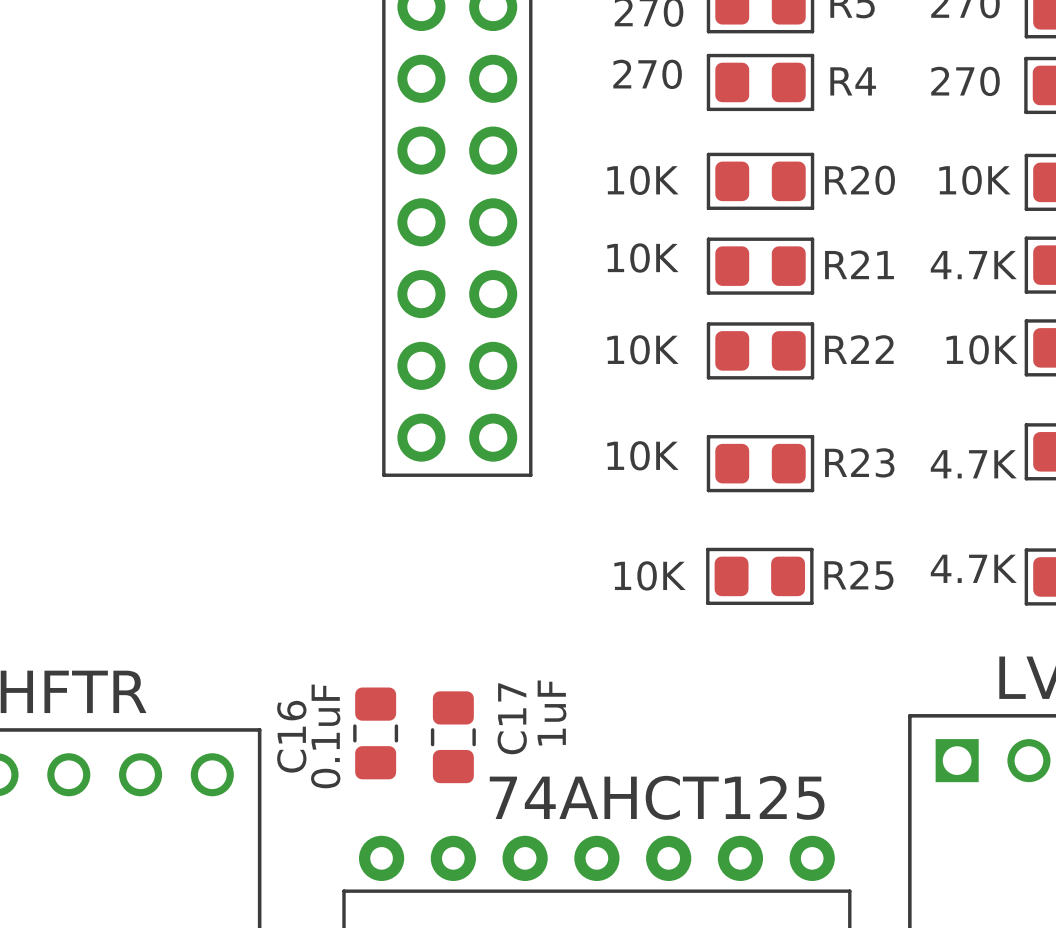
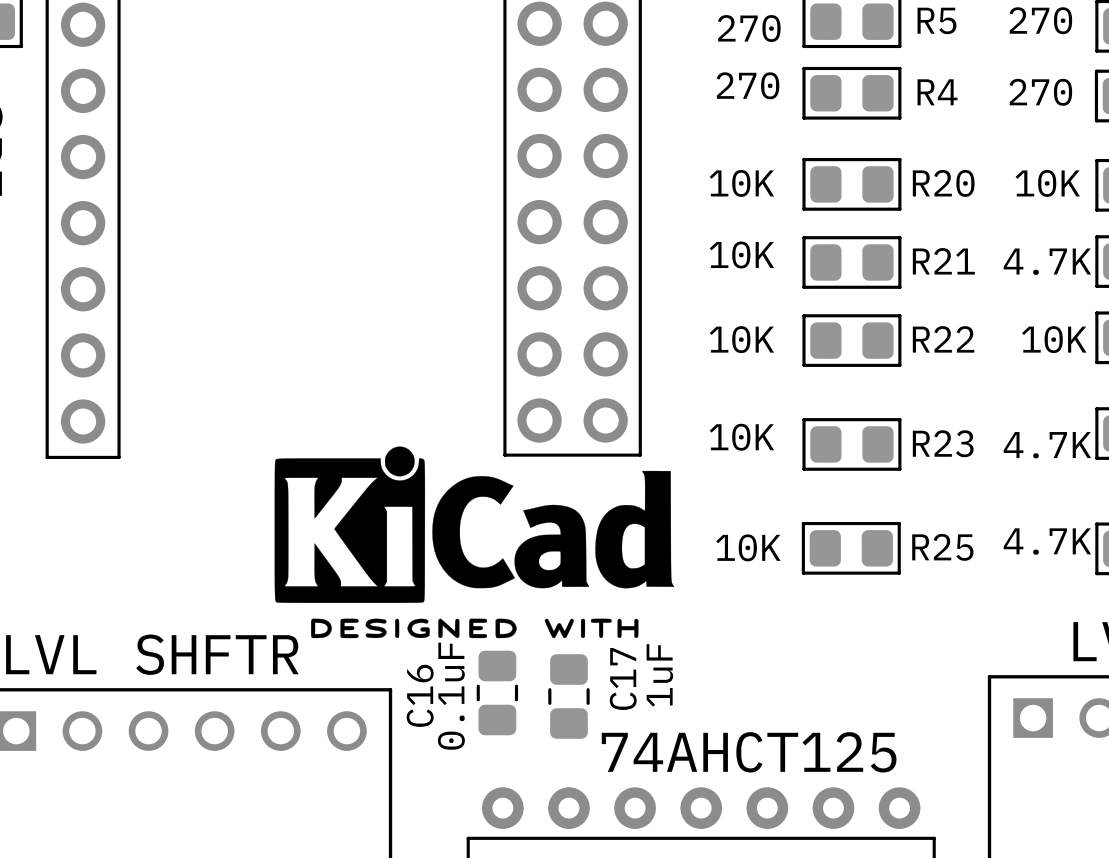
drawing: none -> [274, 446, 675, 639]

